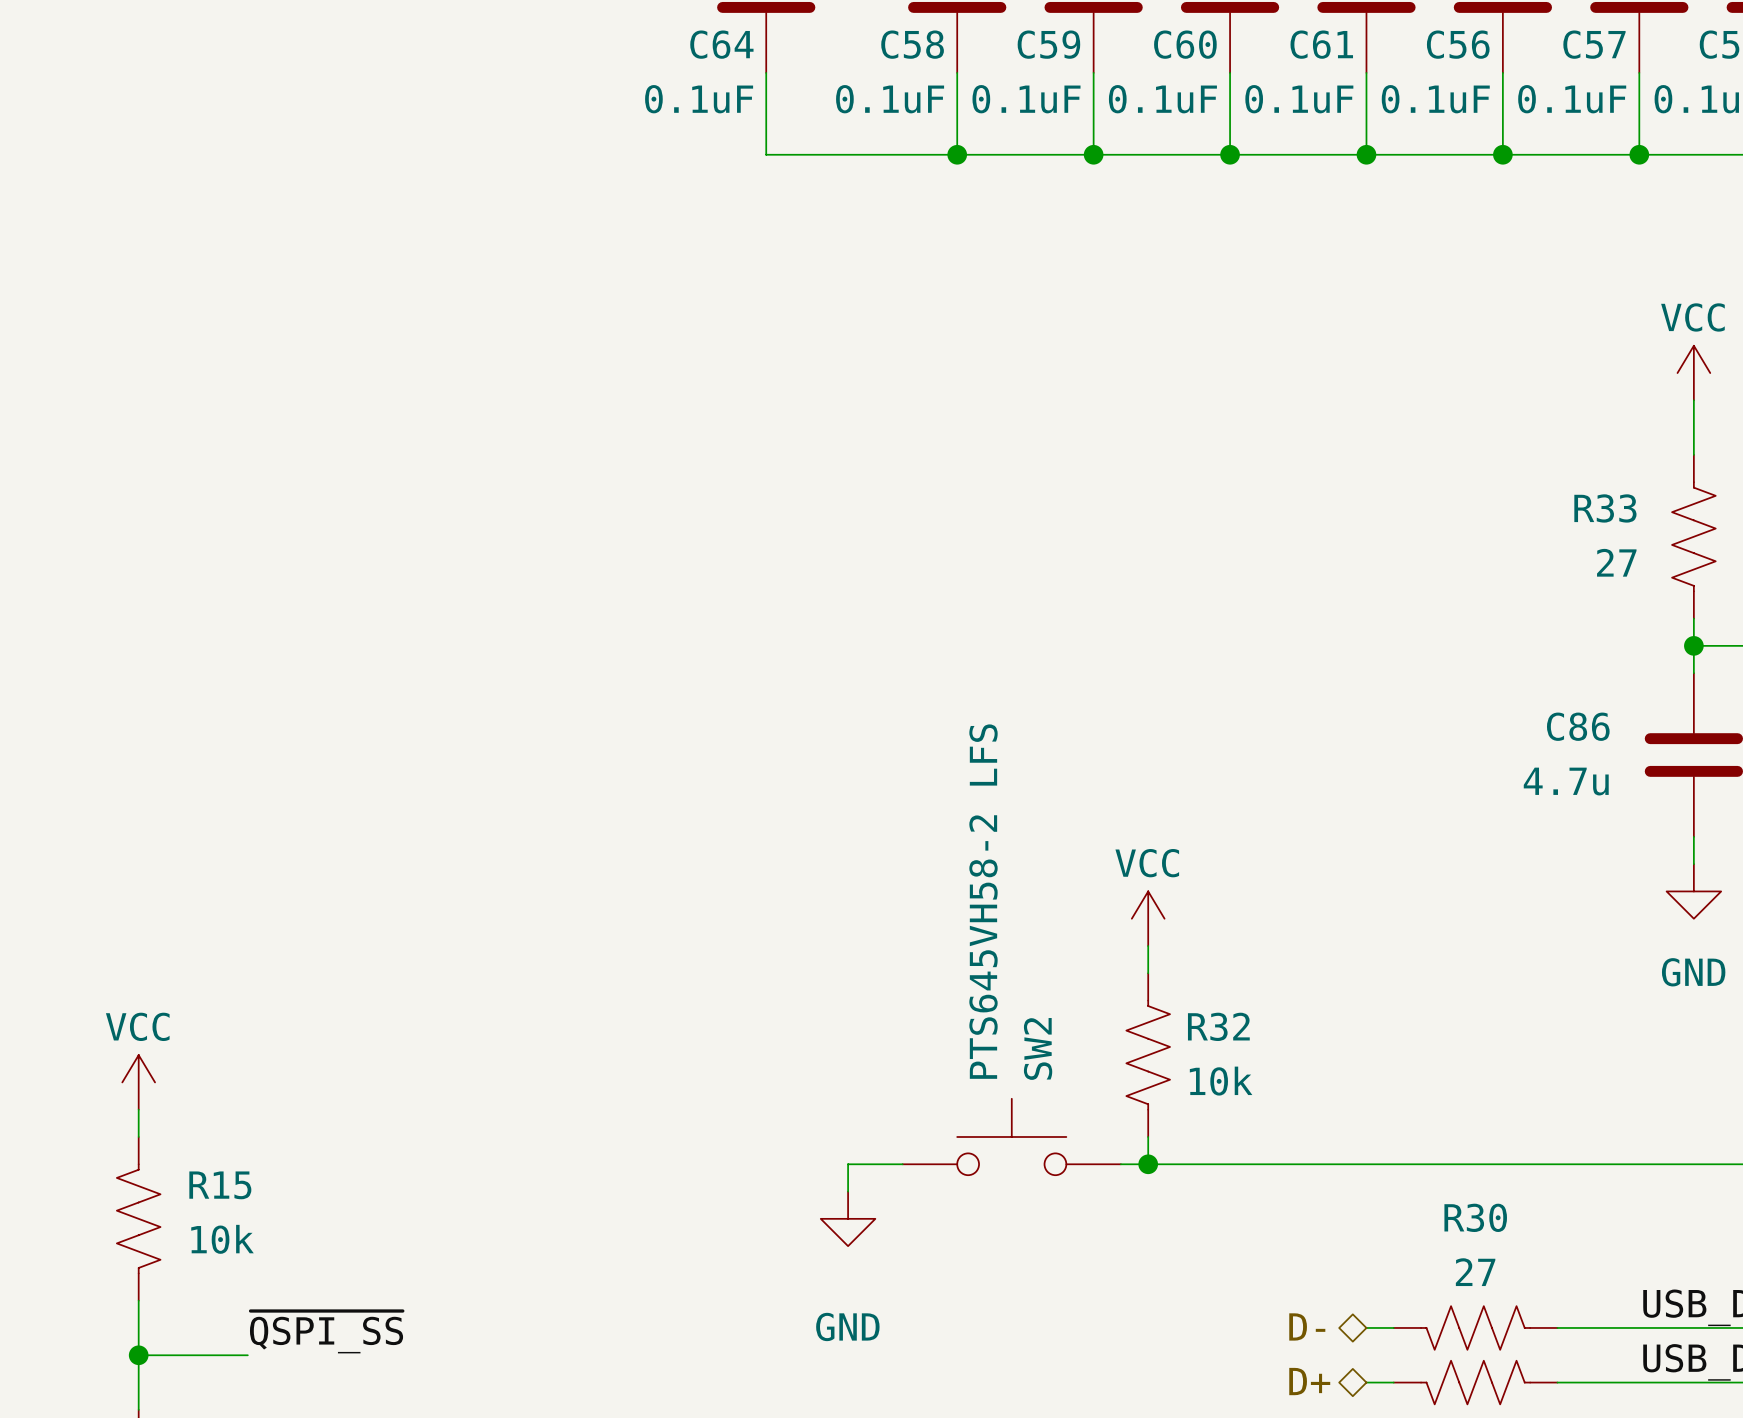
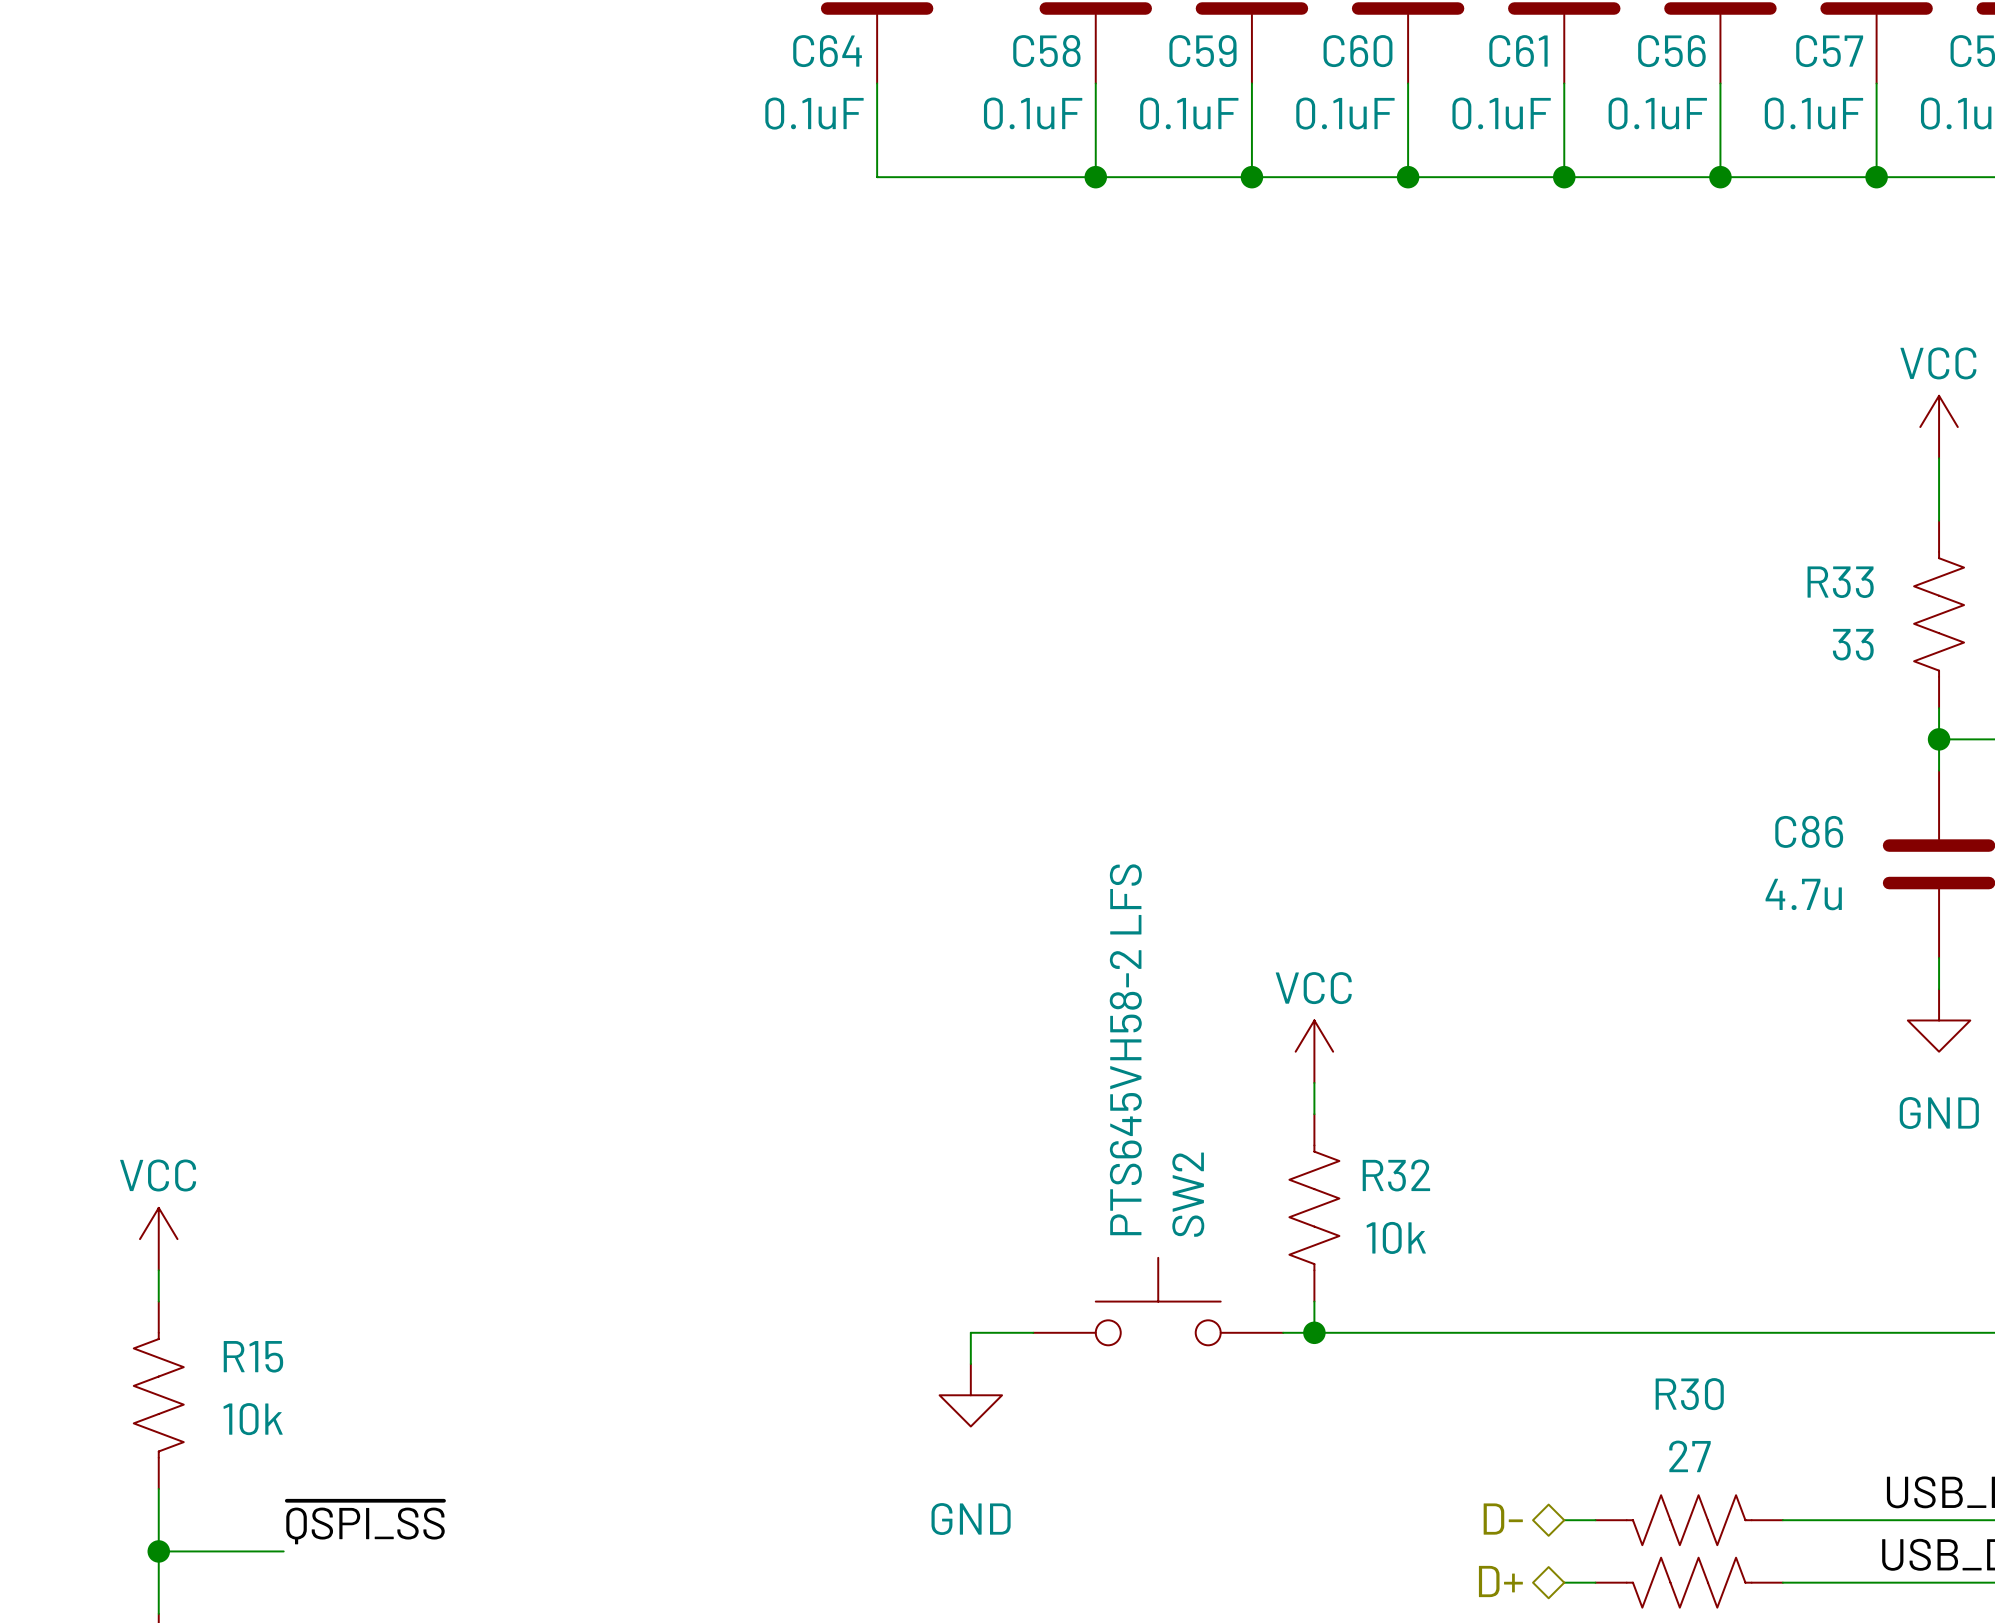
R33 value: 27 (1616, 562) -> 33 (1853, 644)

